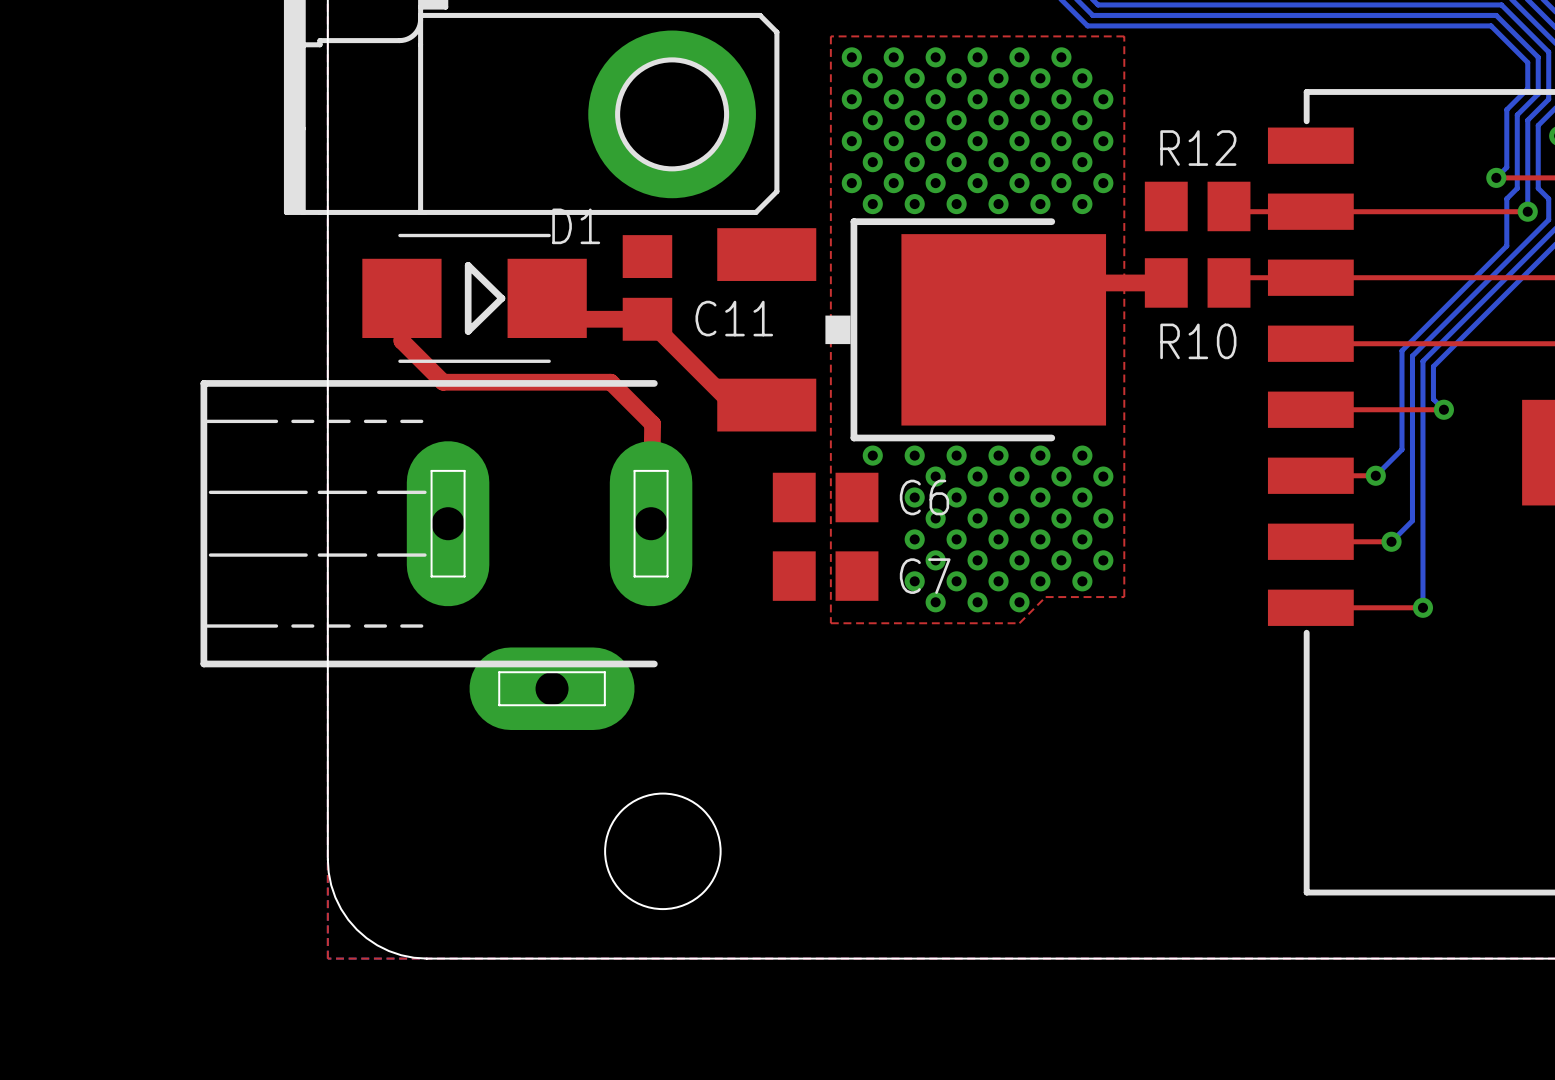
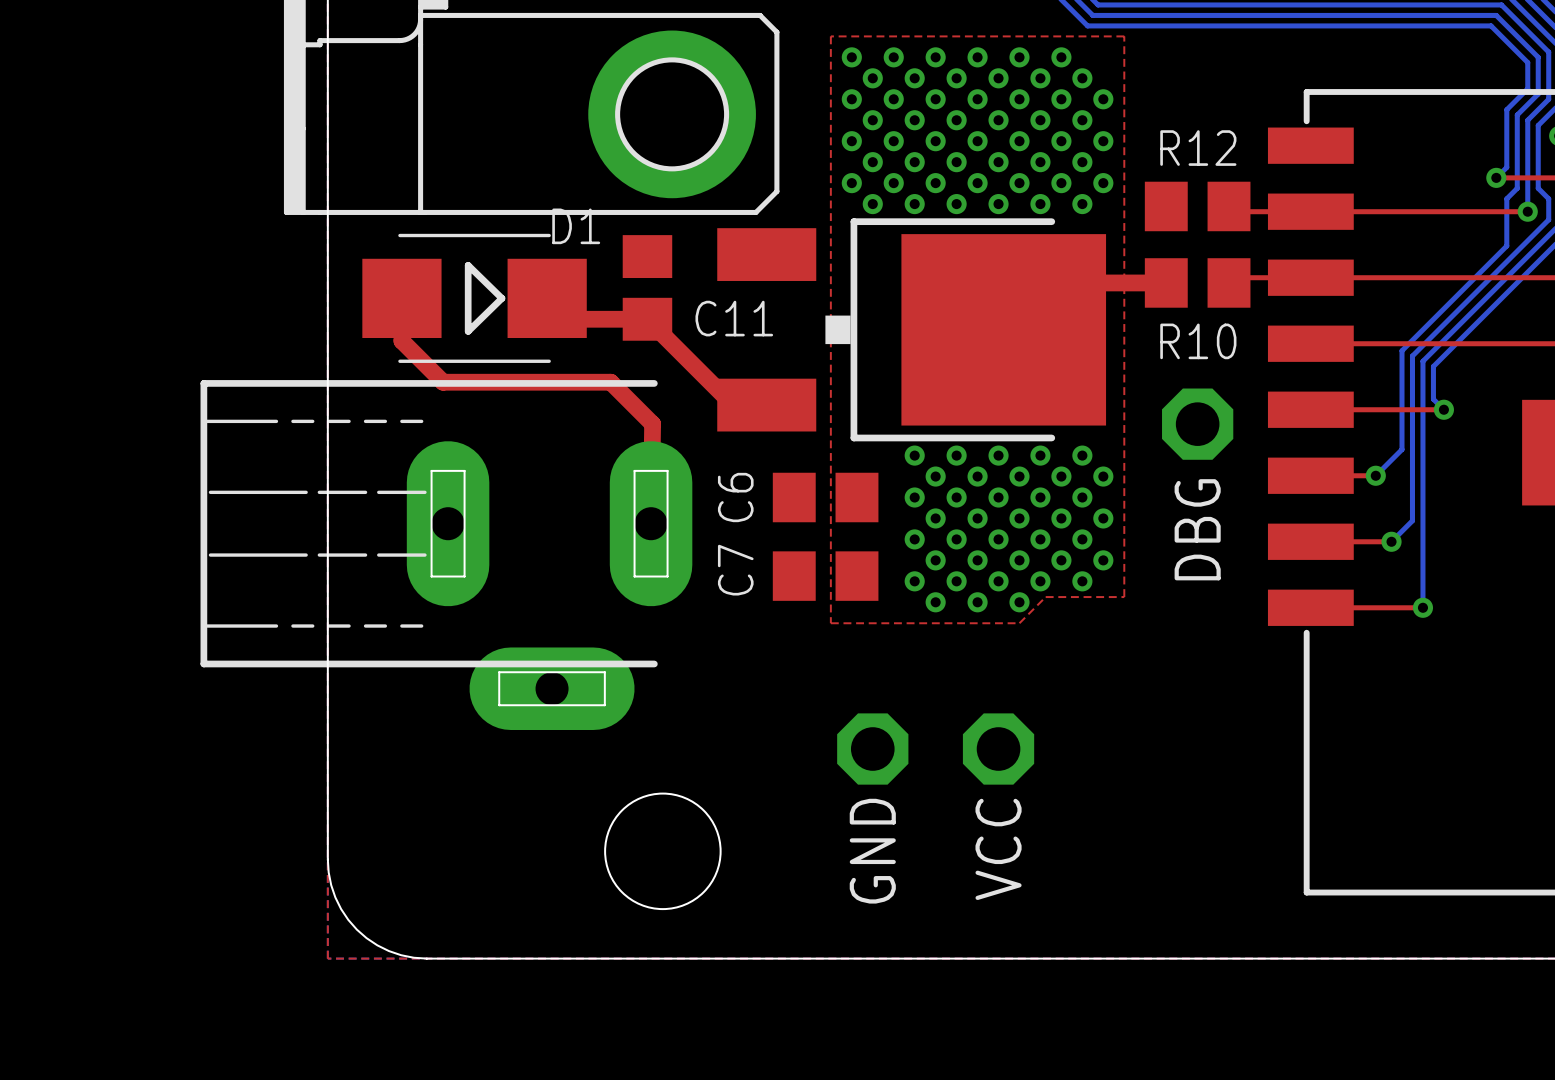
DBG: none -> (1197, 424)
via: (872, 455) -> none
C6 name rotation: 0° (924, 497) -> 90° counterclockwise (735, 497)
C6 name position: C6 (924, 497) -> C6 (735, 497)
C7 name rotation: 0° (925, 576) -> 90° counterclockwise (735, 570)
C7 name position: C7 (925, 576) -> C7 (735, 570)
GND: none -> (872, 749)
VCC: none -> (998, 749)

